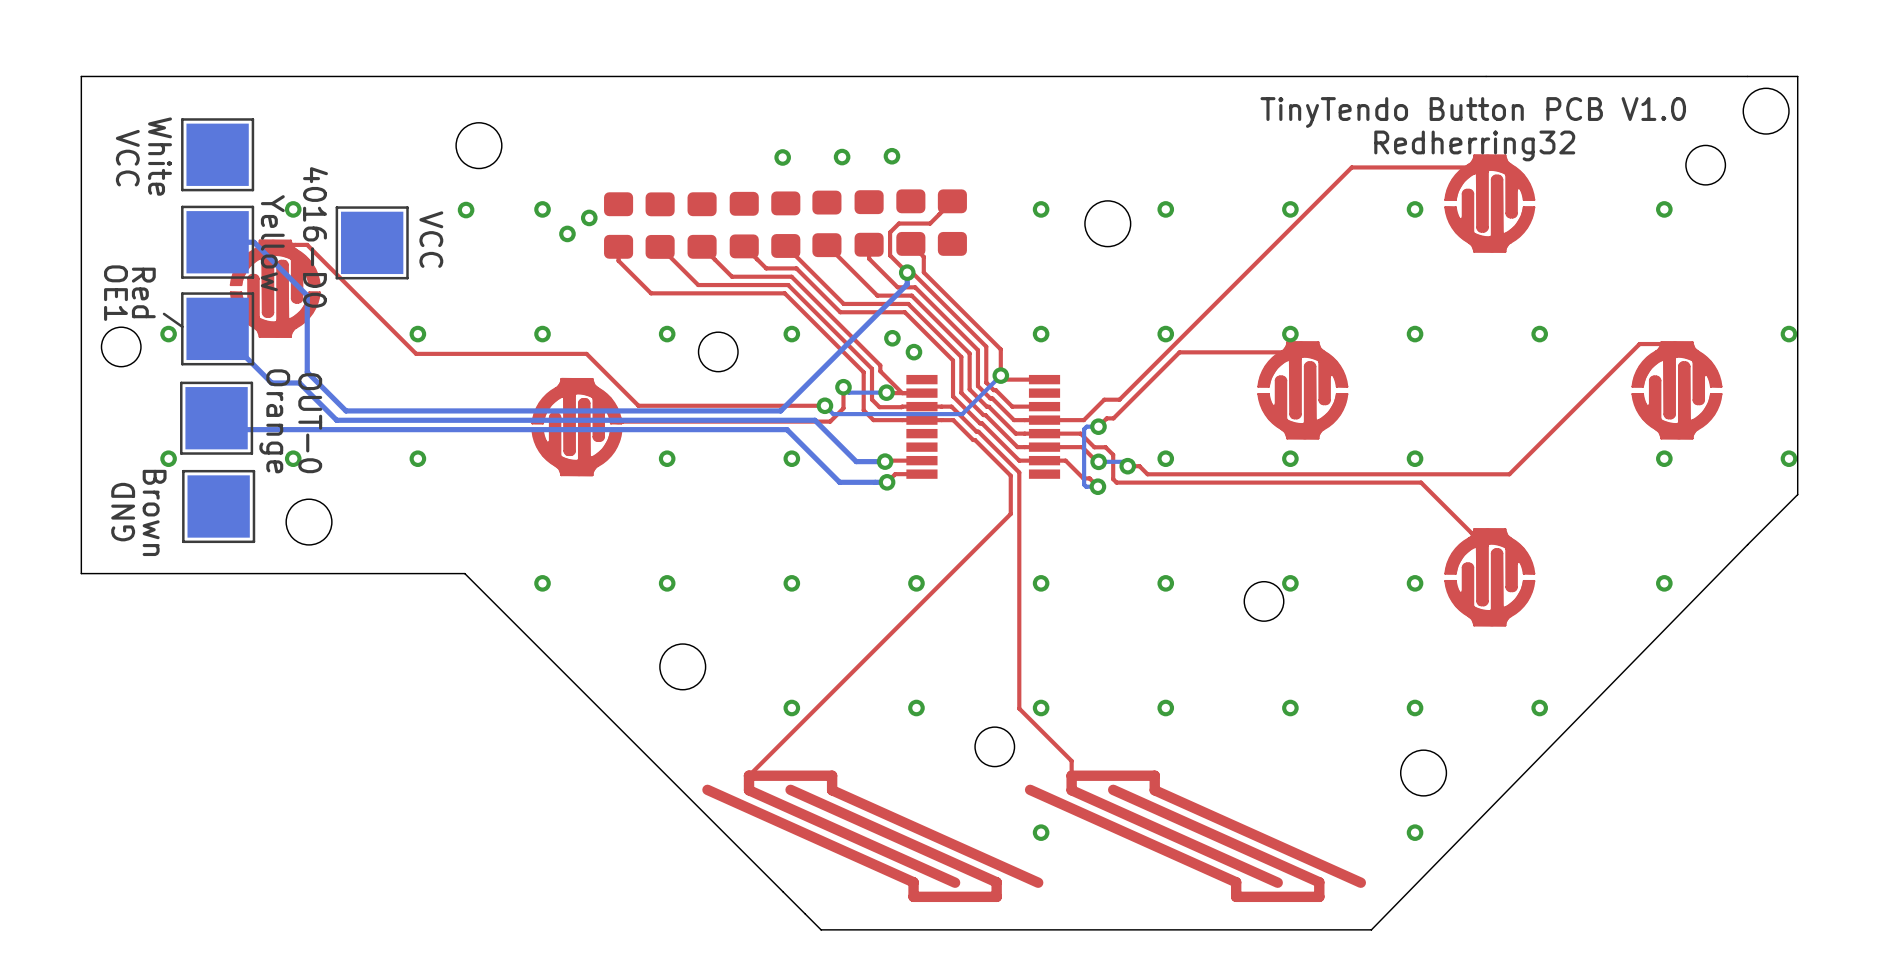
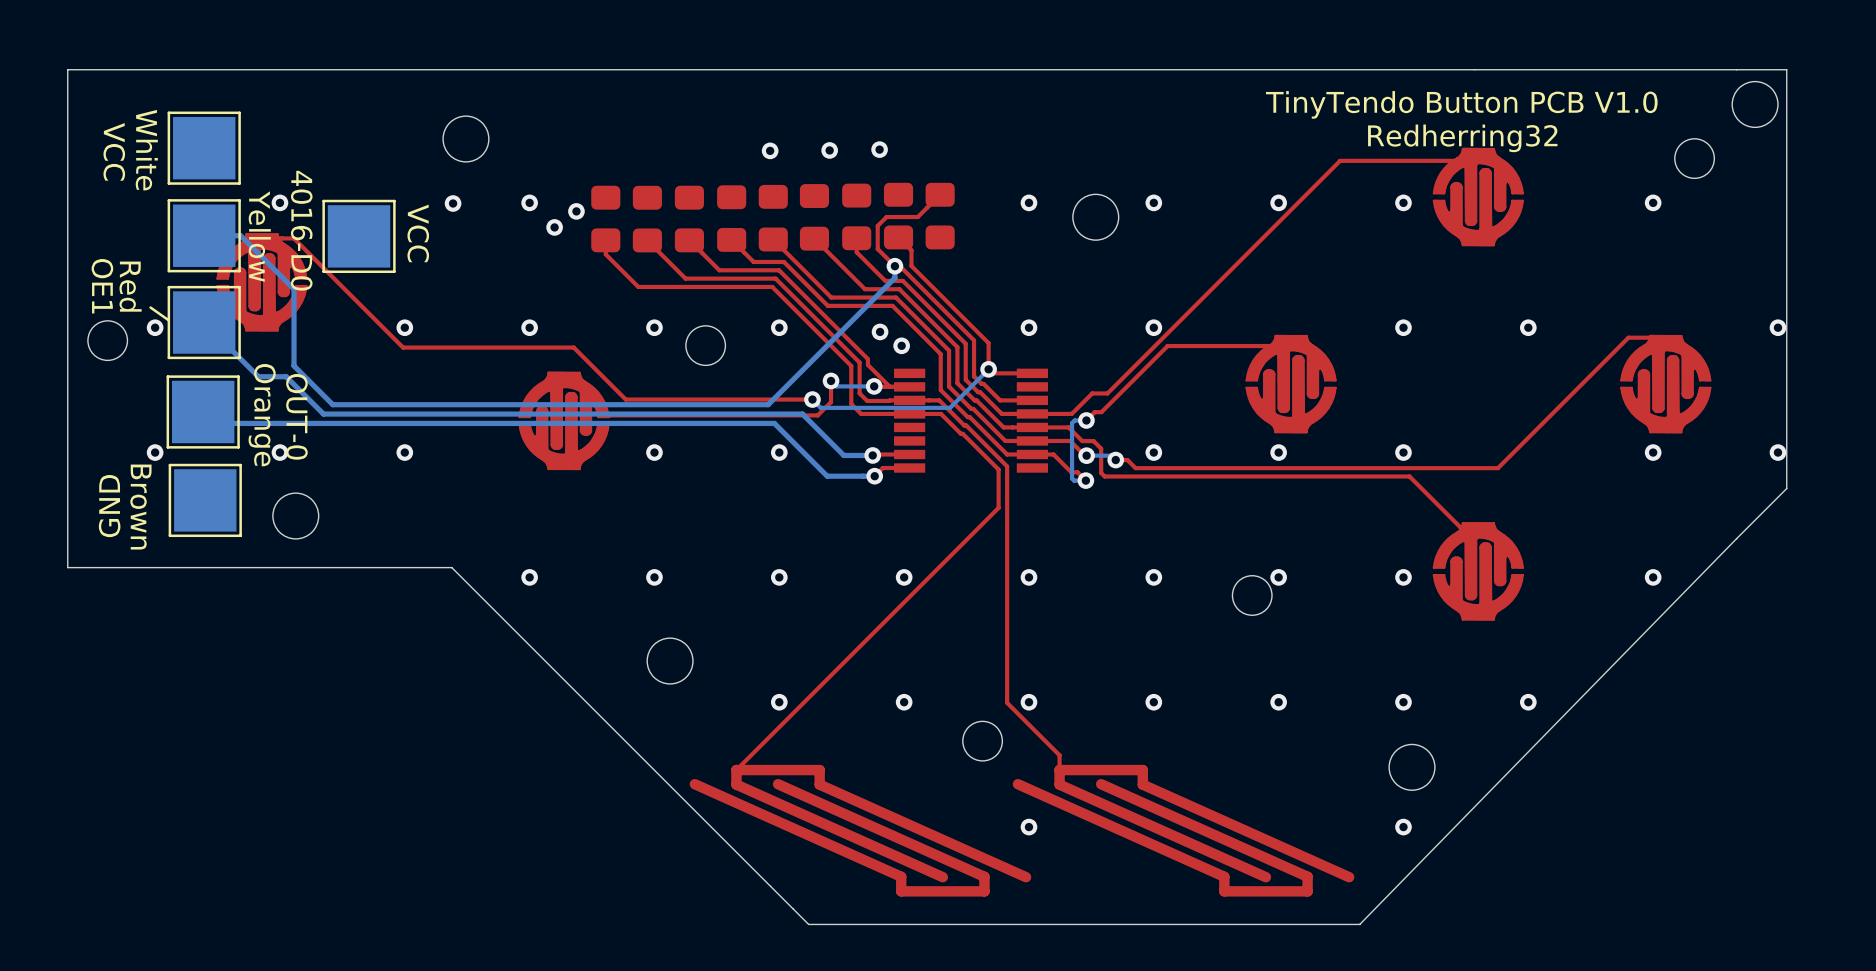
via: (1290, 334) -> none

